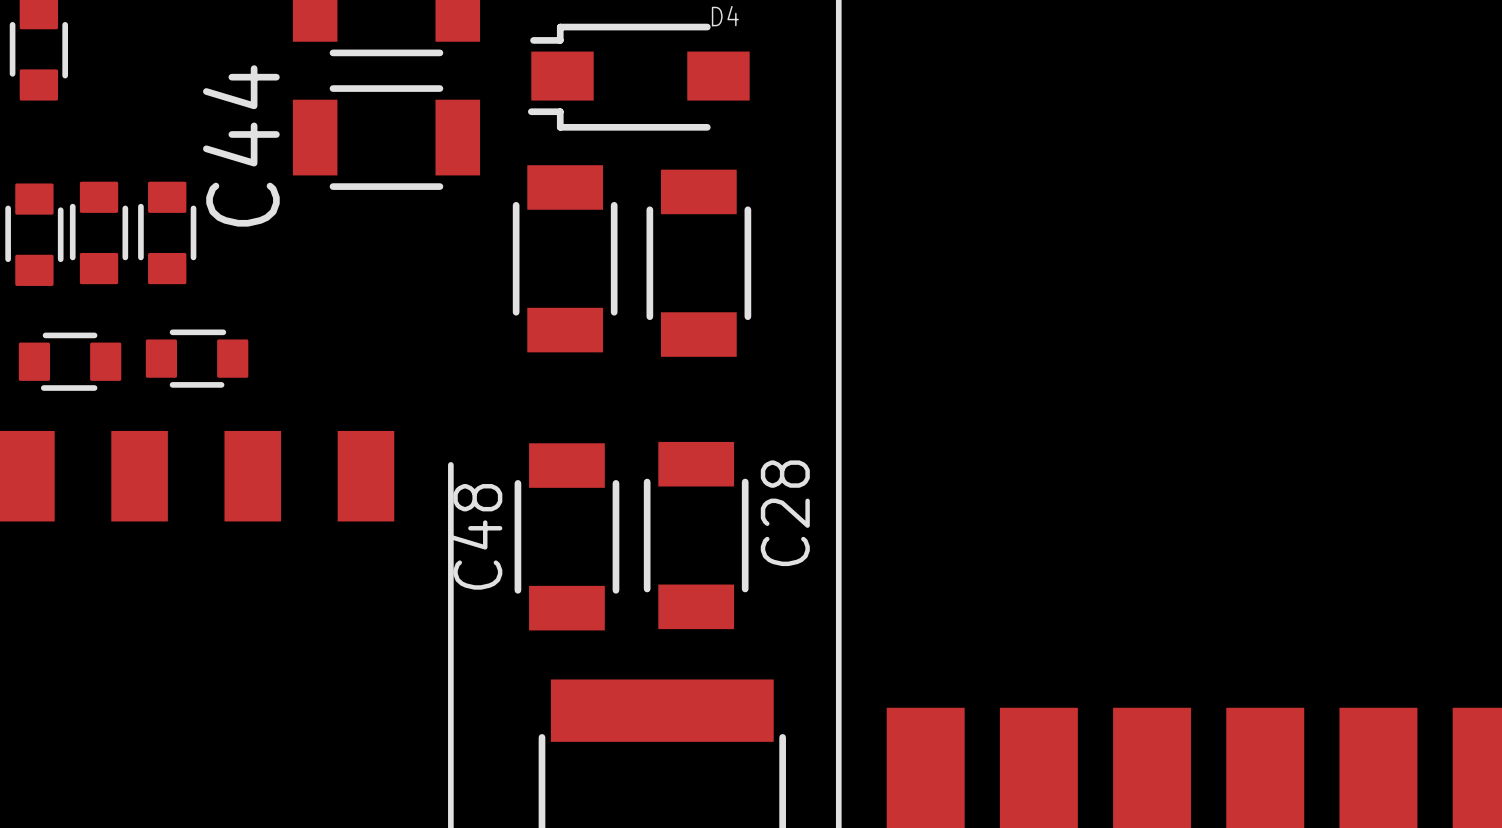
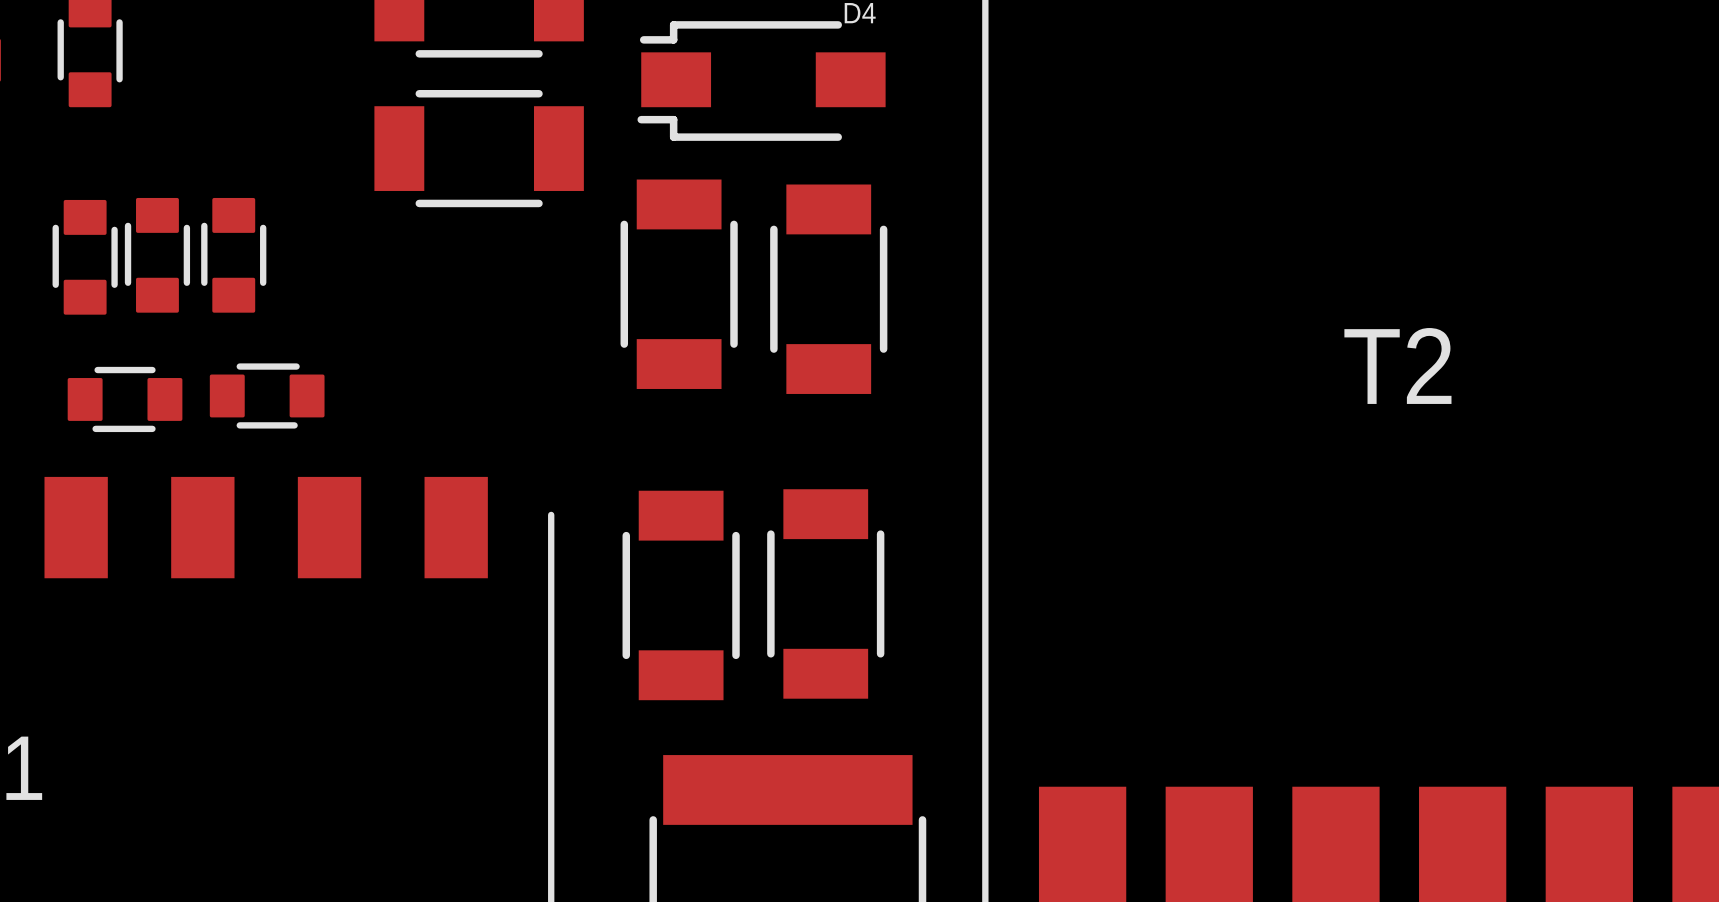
C44 name: C44 (241, 145) -> none
T2 name: none -> T2 (1397, 365)
C28 name: C28 (785, 513) -> none
C48 name: C48 (476, 536) -> none

